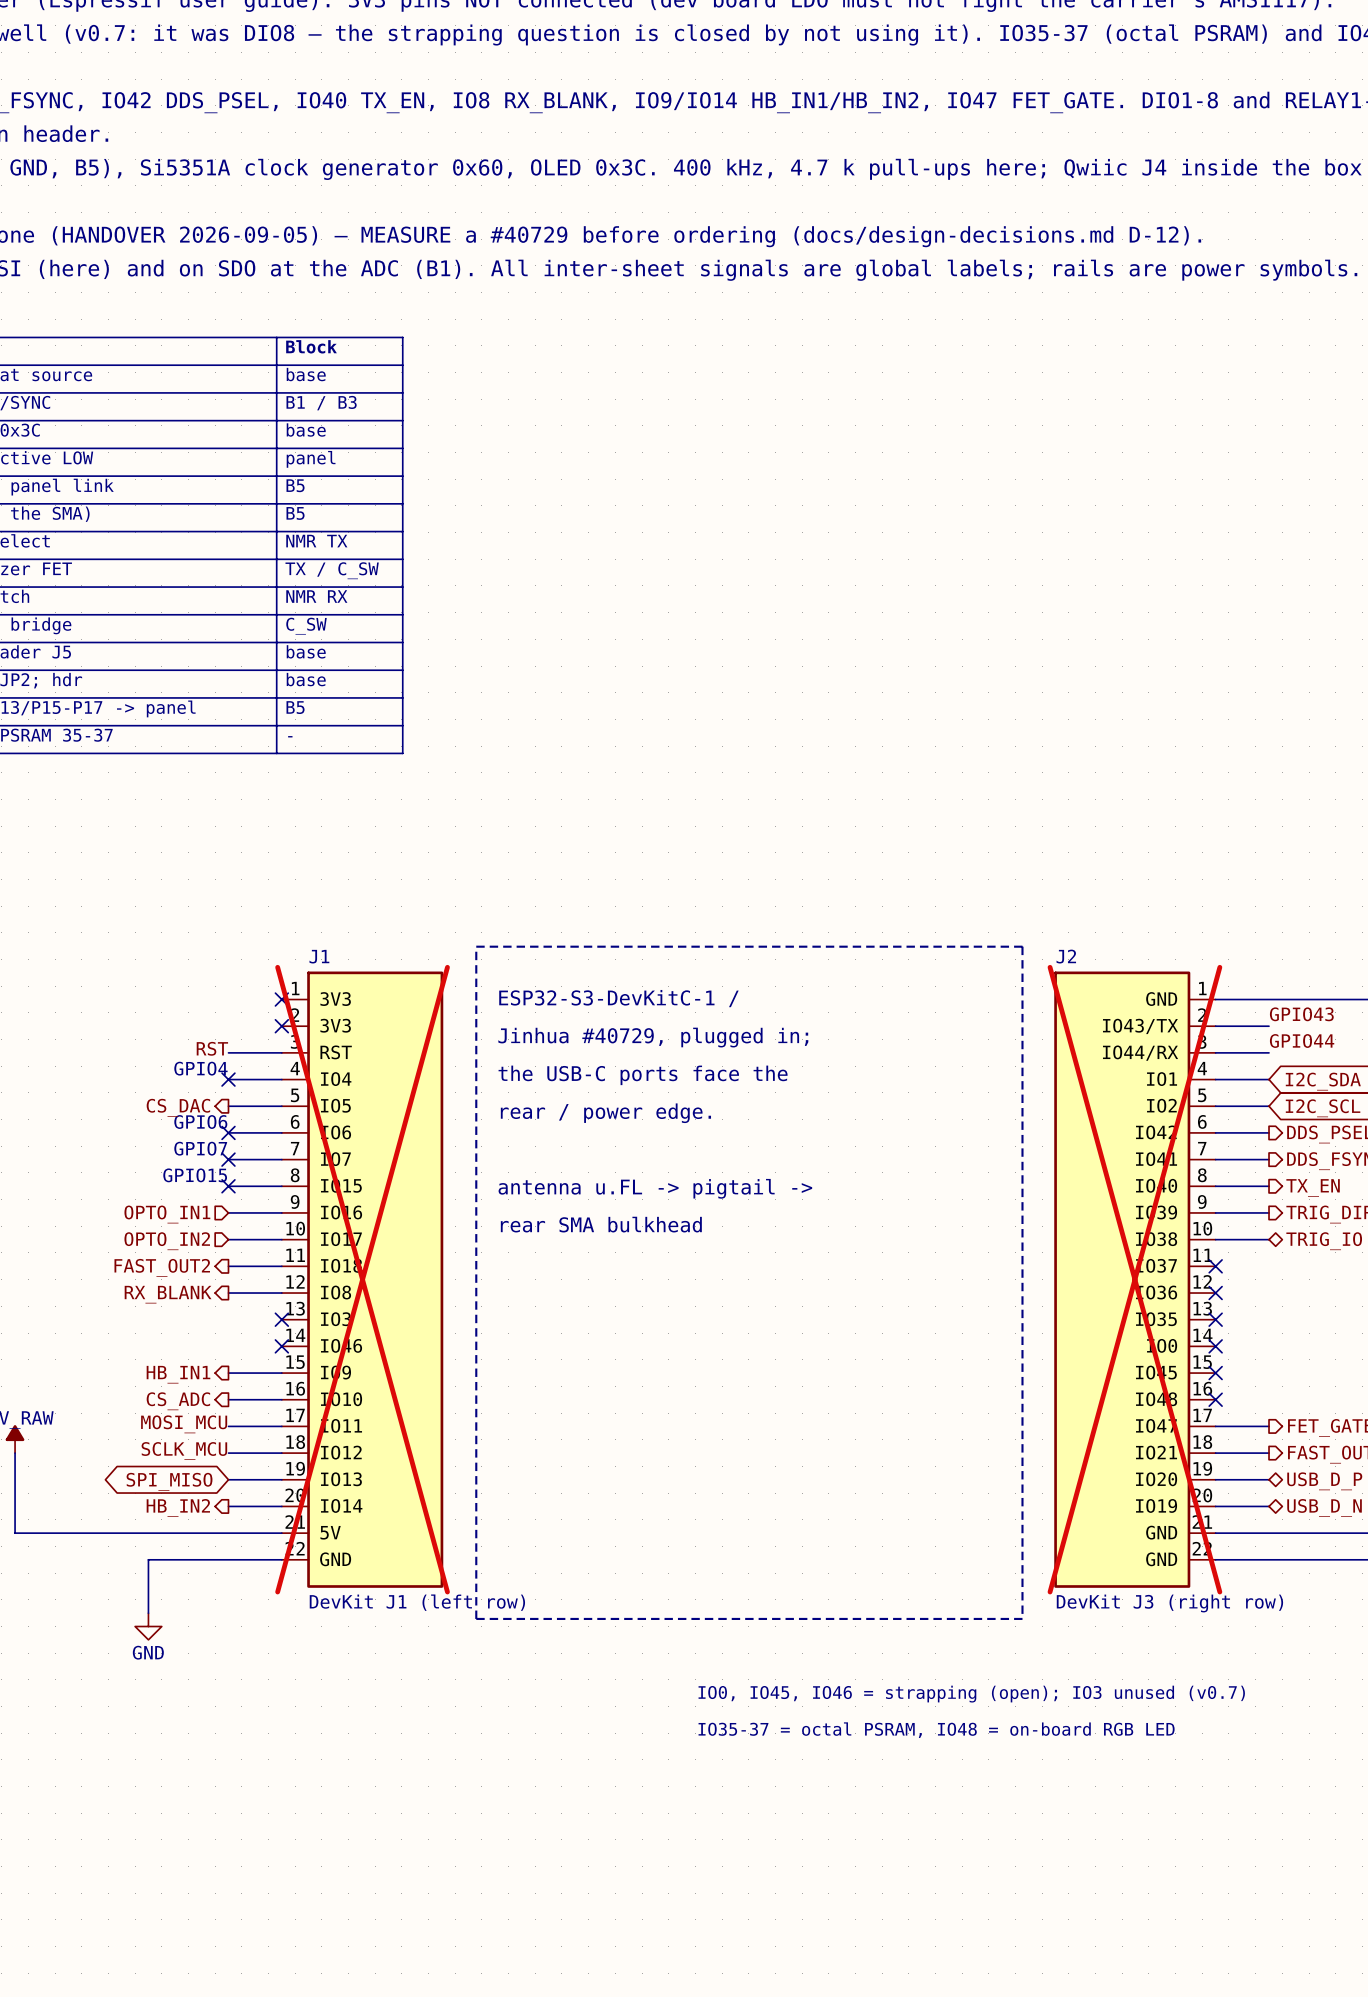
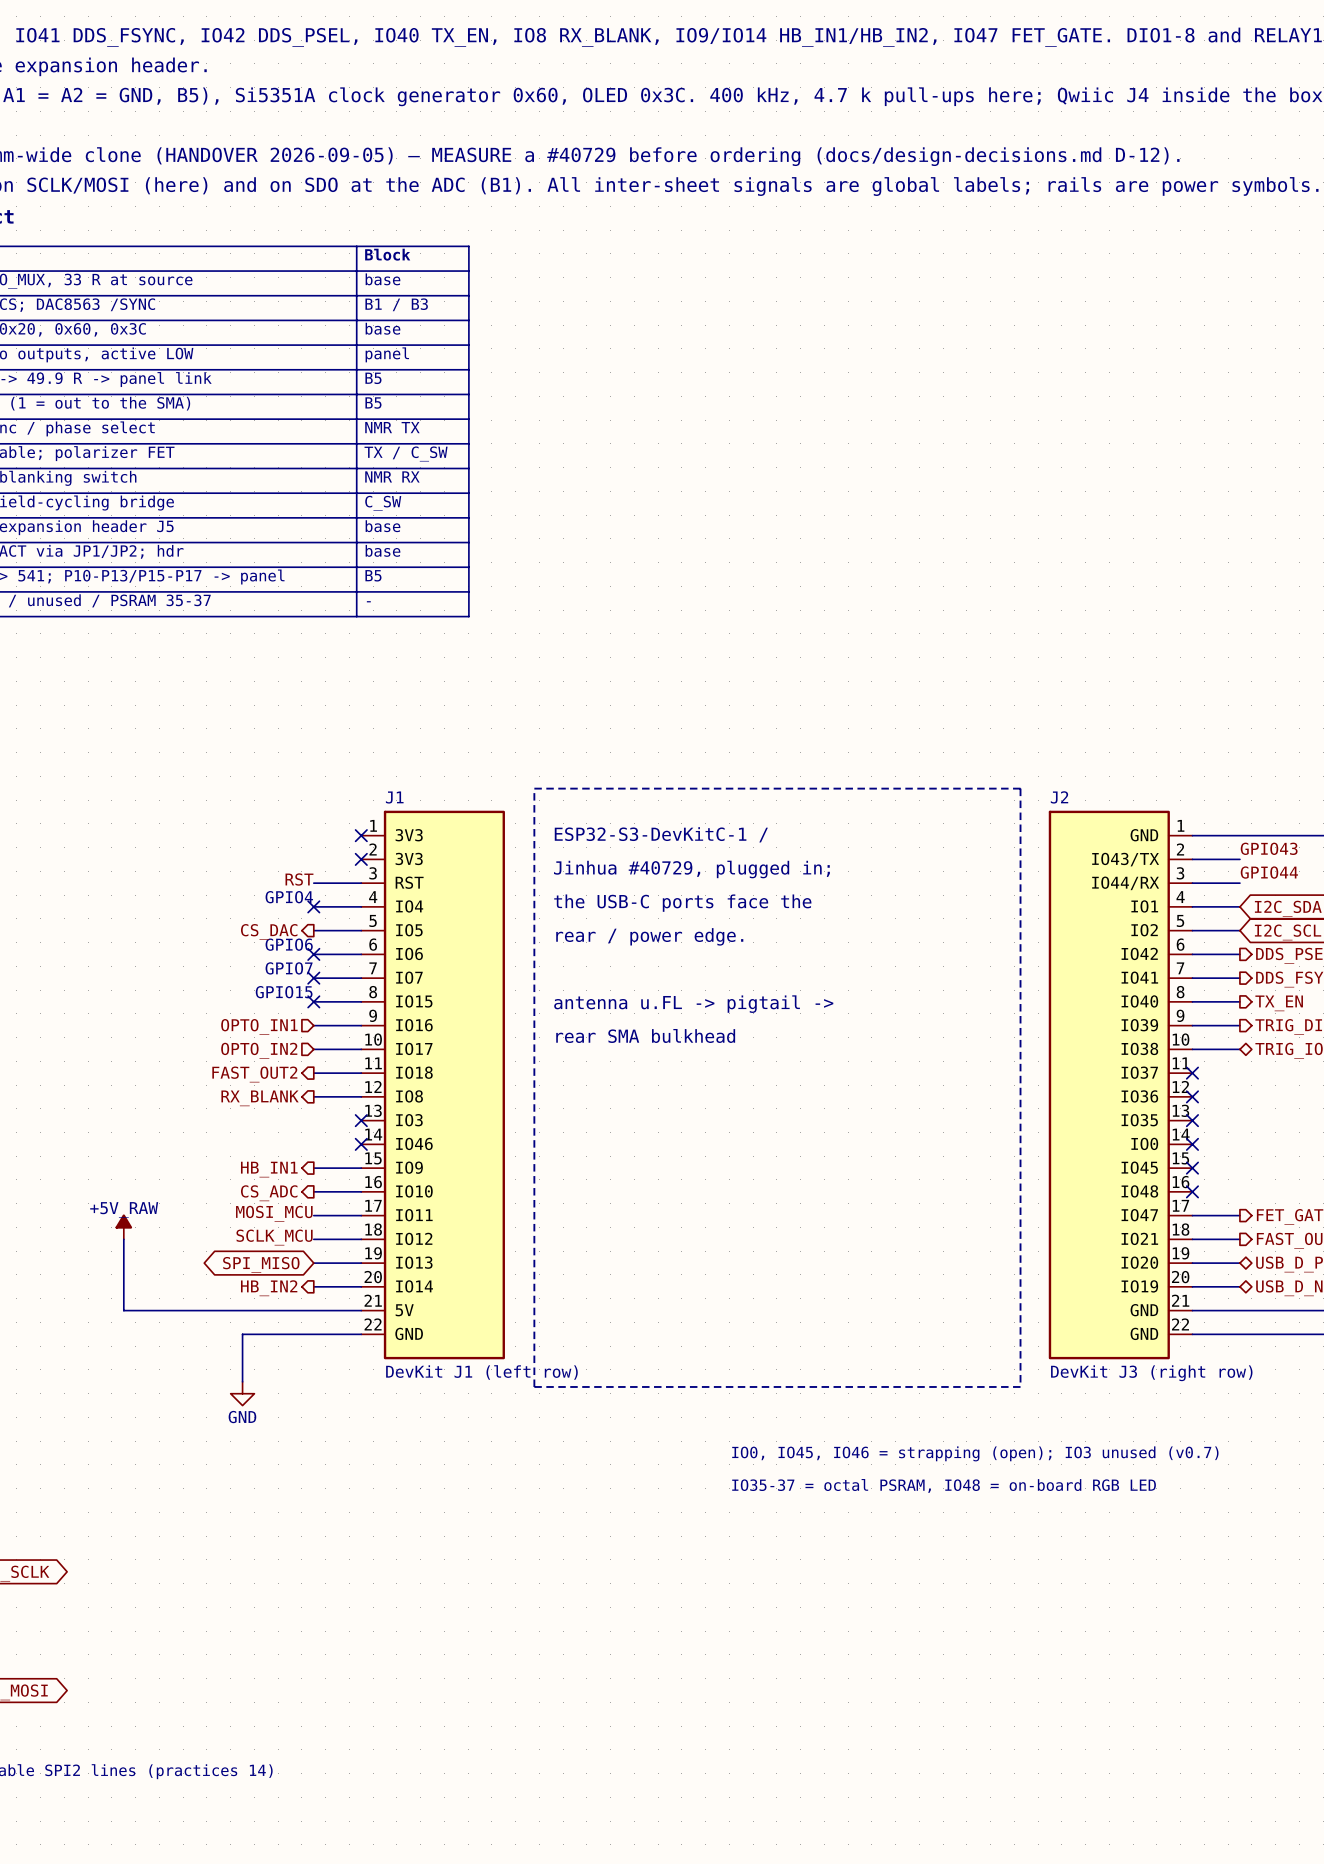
J1 do-not-place cross: (362, 1279) -> none
J2 do-not-place cross: (1134, 1279) -> none

